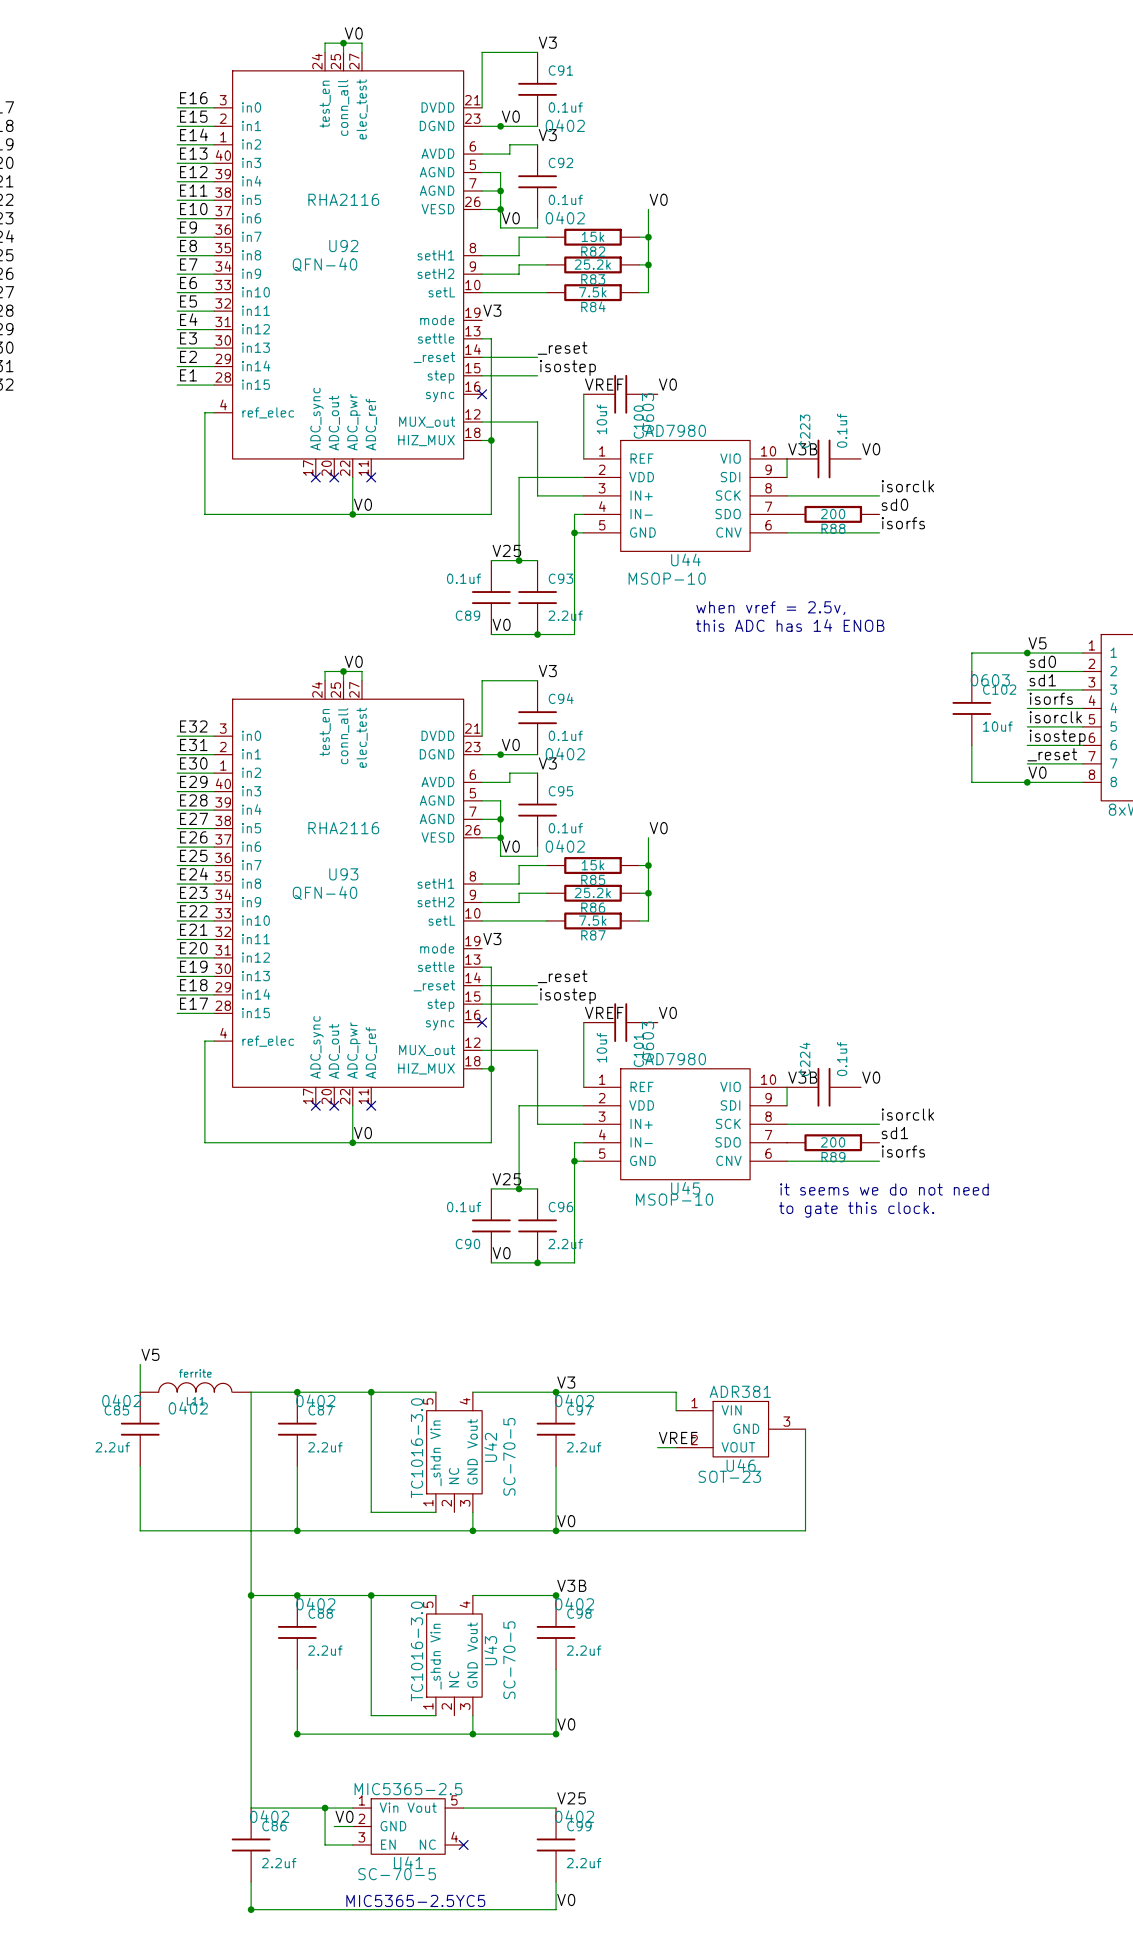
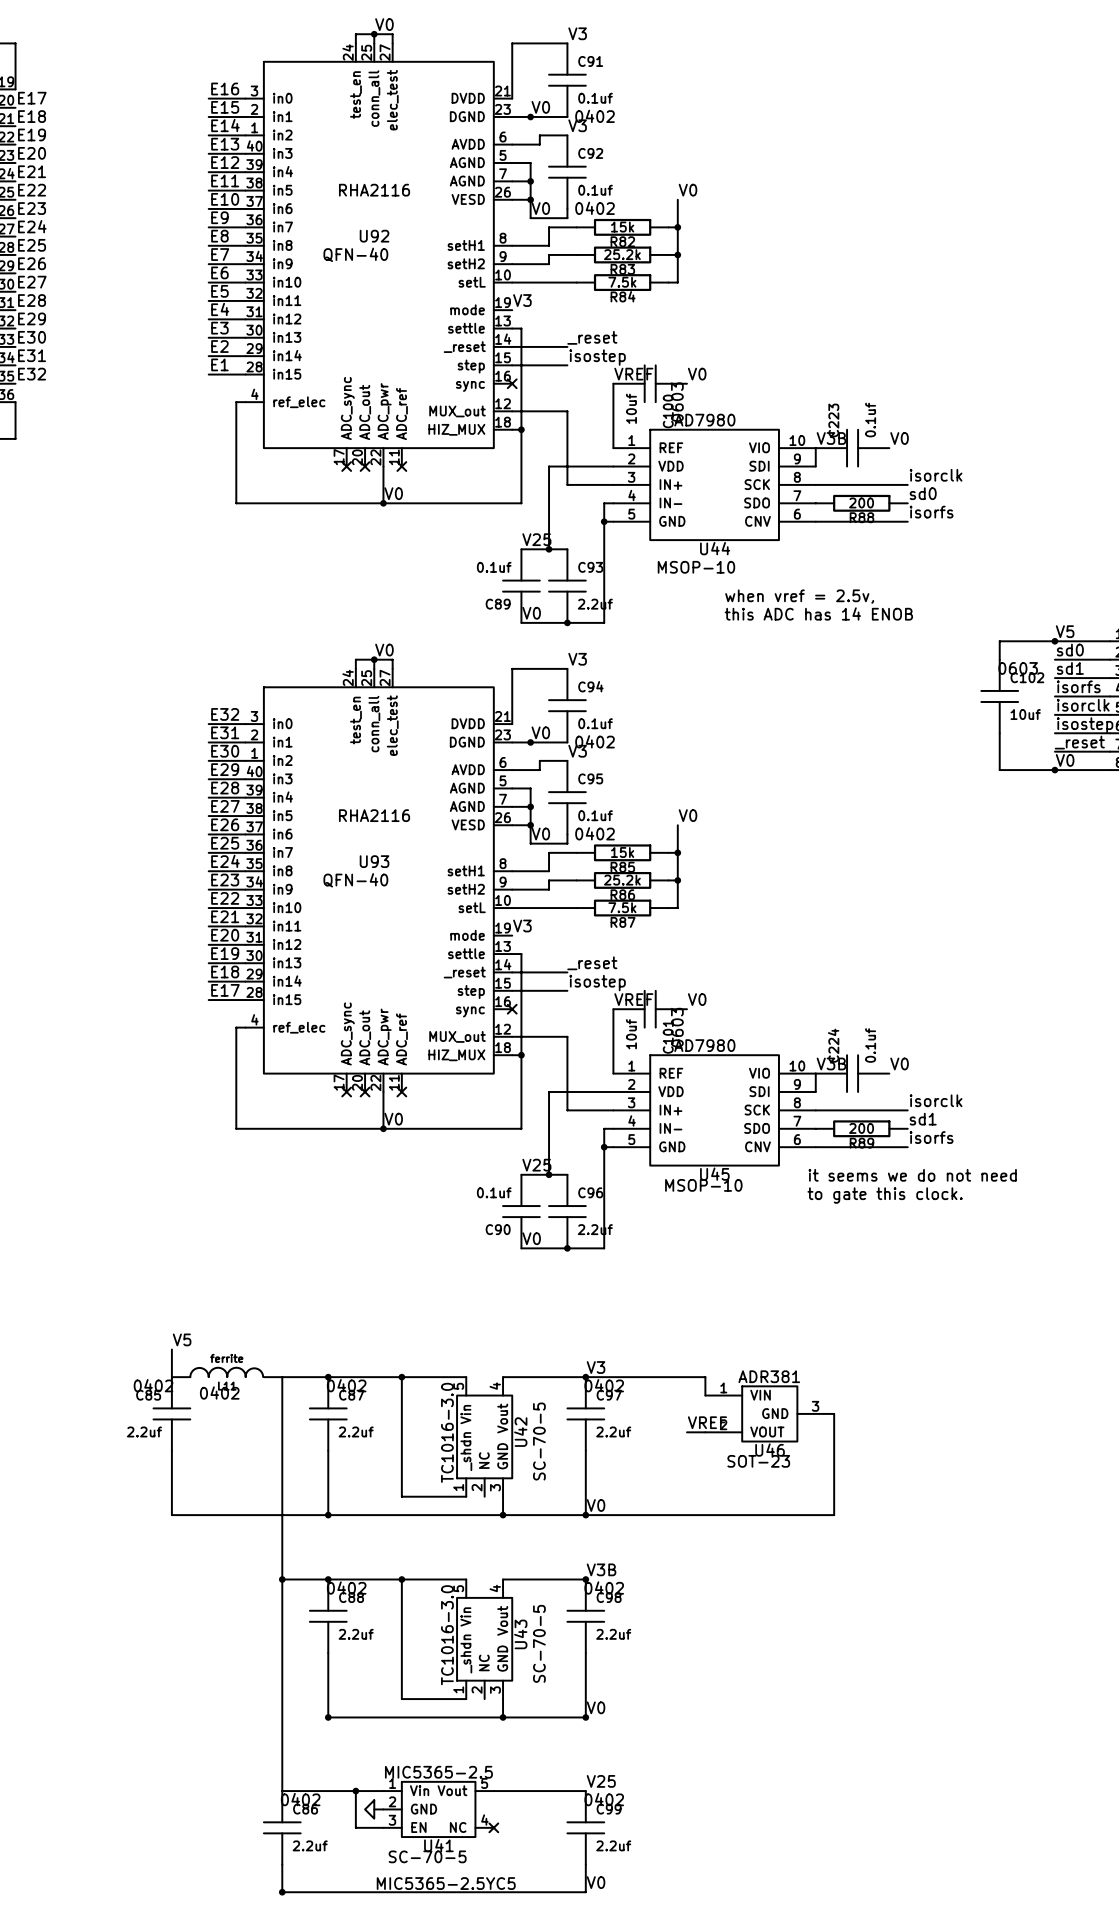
label: V0 (344, 1816) -> none
wire: (334, 1826) (343, 1826) -> none
power symbol: none -> (369, 1809)

